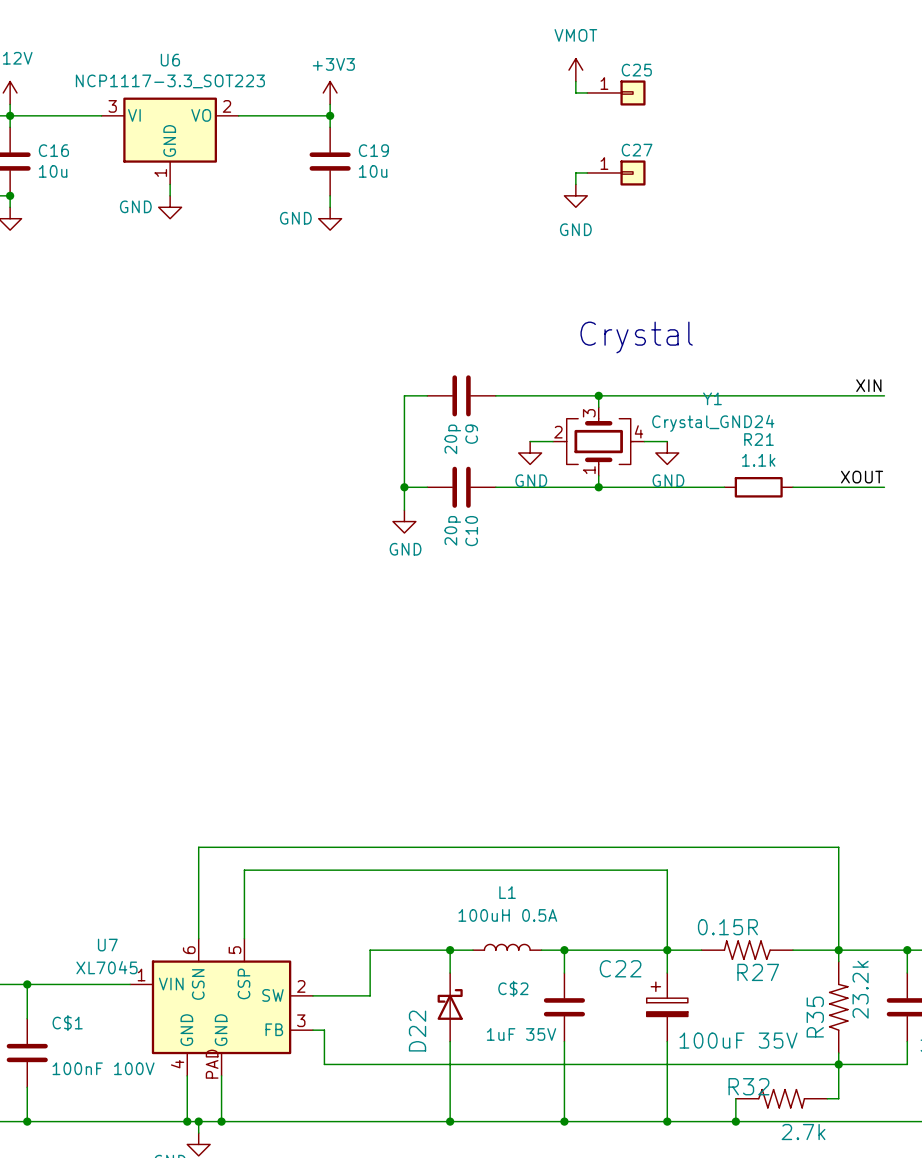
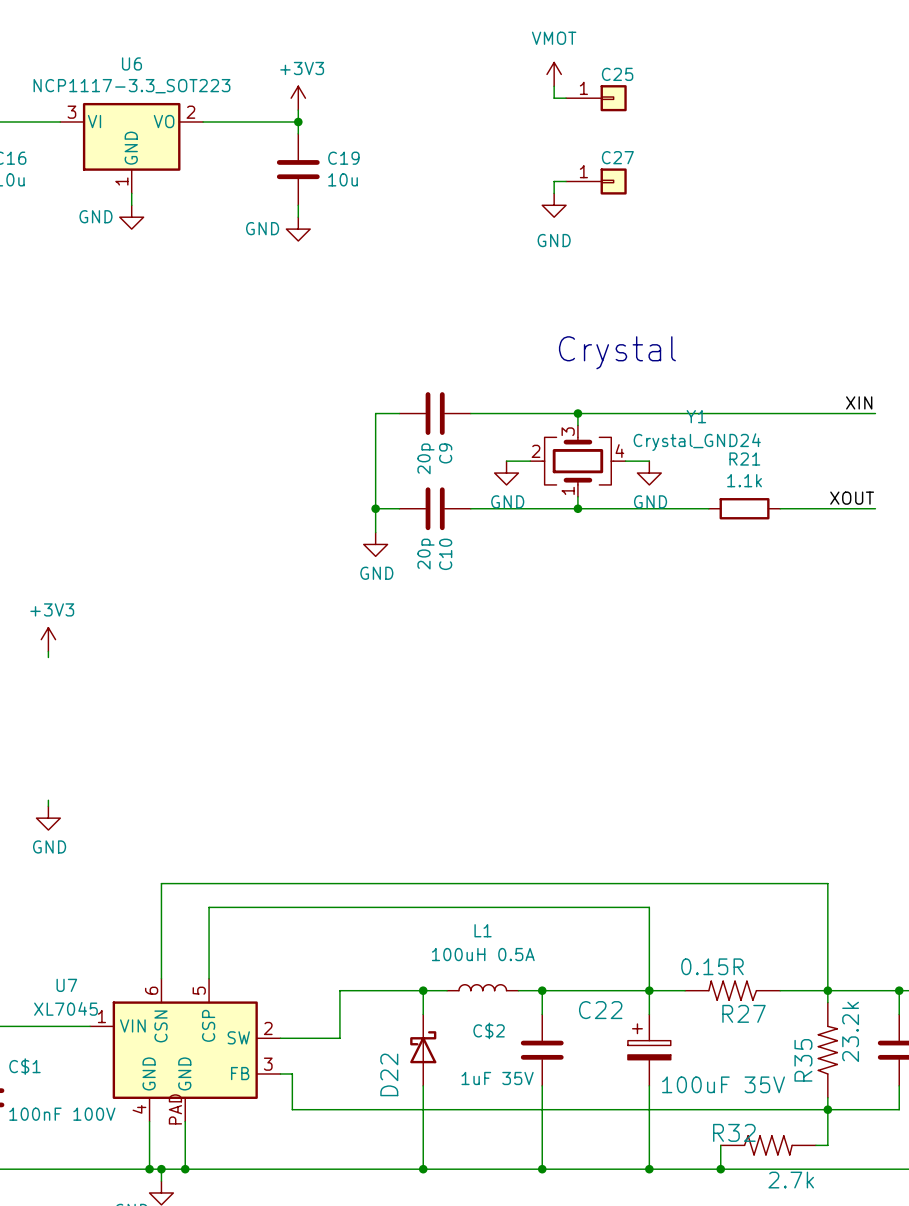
power symbol: none -> +3V3 (48, 639)
wire: none -> (48, 651) (48, 657)
wire: none -> (48, 800) (48, 806)
power symbol: none -> GND (48, 818)

